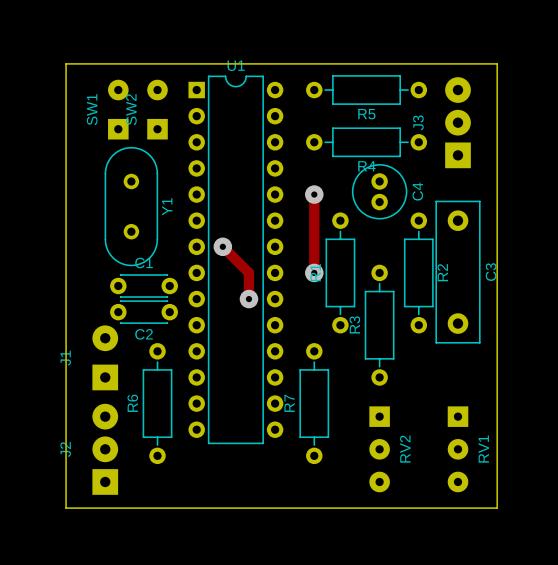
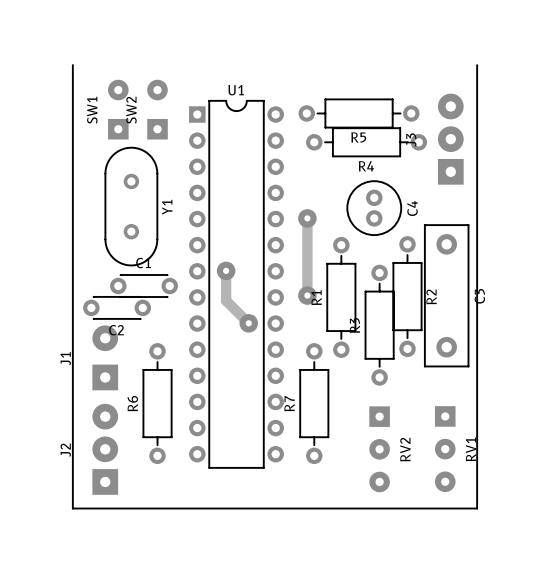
board edge: (66, 63) (66, 508) (497, 508) (497, 63) (66, 63) -> none
board edge: none -> (72, 65) (72, 508) (477, 508) (477, 65)
R5 position: (366, 90) -> (359, 113)
J3 position: (458, 122) -> (450, 139)
C4 position: (379, 191) -> (374, 208)
track: (314, 194) (314, 272) -> none
via position: (314, 194) -> (307, 218)
track: none -> (307, 218) (307, 295)
track: (222, 246) (248, 272) (248, 299) -> none
via: (222, 246) -> none
U1 position: (235, 259) -> (236, 284)
track: none -> (226, 270) (226, 300) (248, 323)
via: none -> (226, 270)
via position: (314, 272) -> (307, 295)
R1 position: (340, 272) -> (341, 297)
R2 position: (418, 272) -> (407, 296)
C3 position: (458, 272) -> (446, 295)
via: (248, 299) -> none
C2 position: (144, 312) -> (117, 307)
via: none -> (248, 323)
RV1 position: (458, 449) -> (445, 449)

